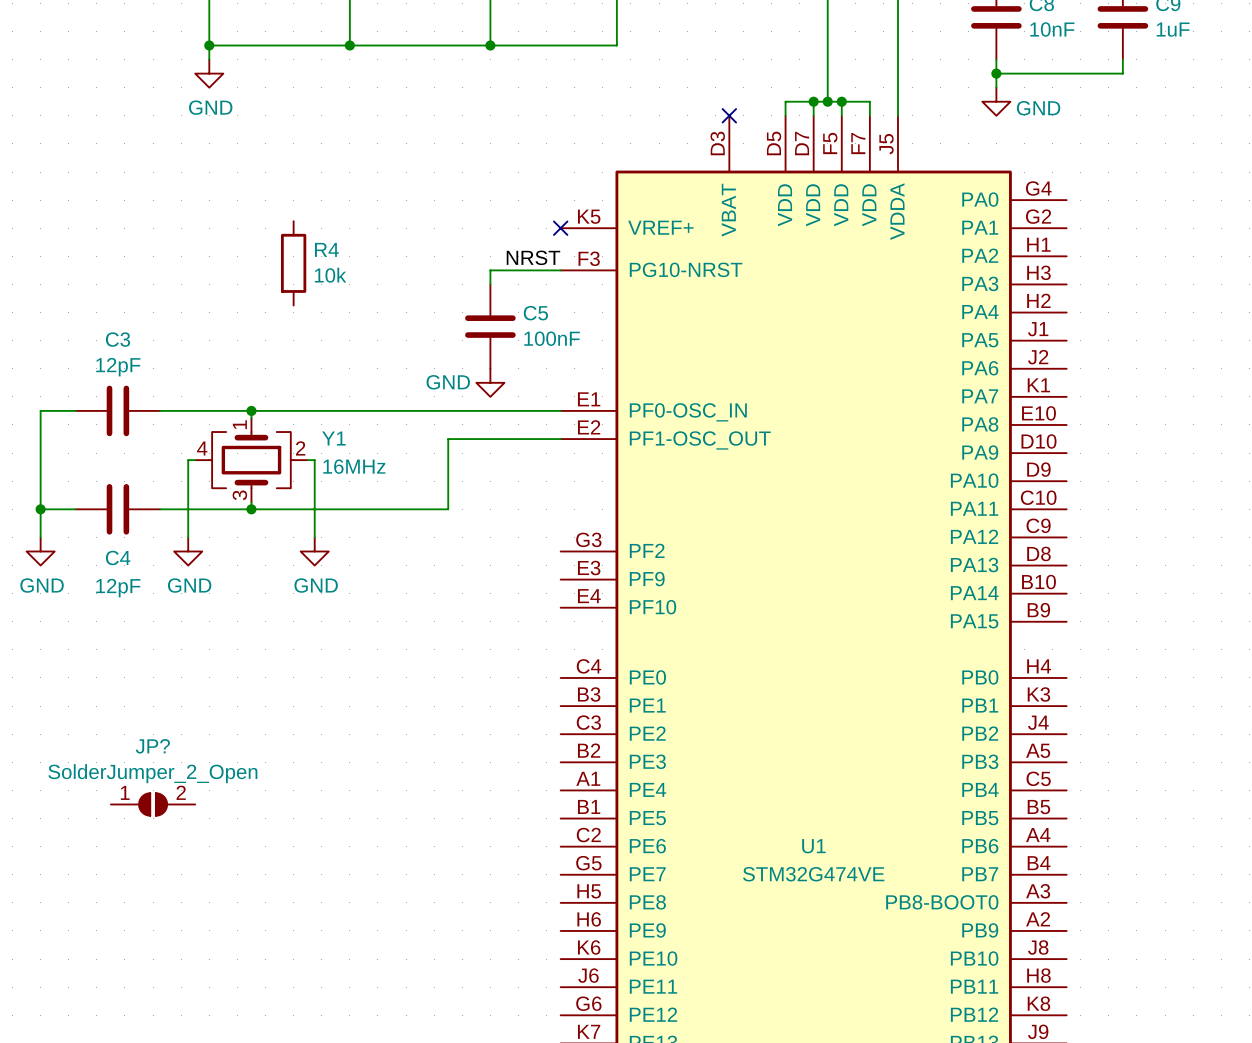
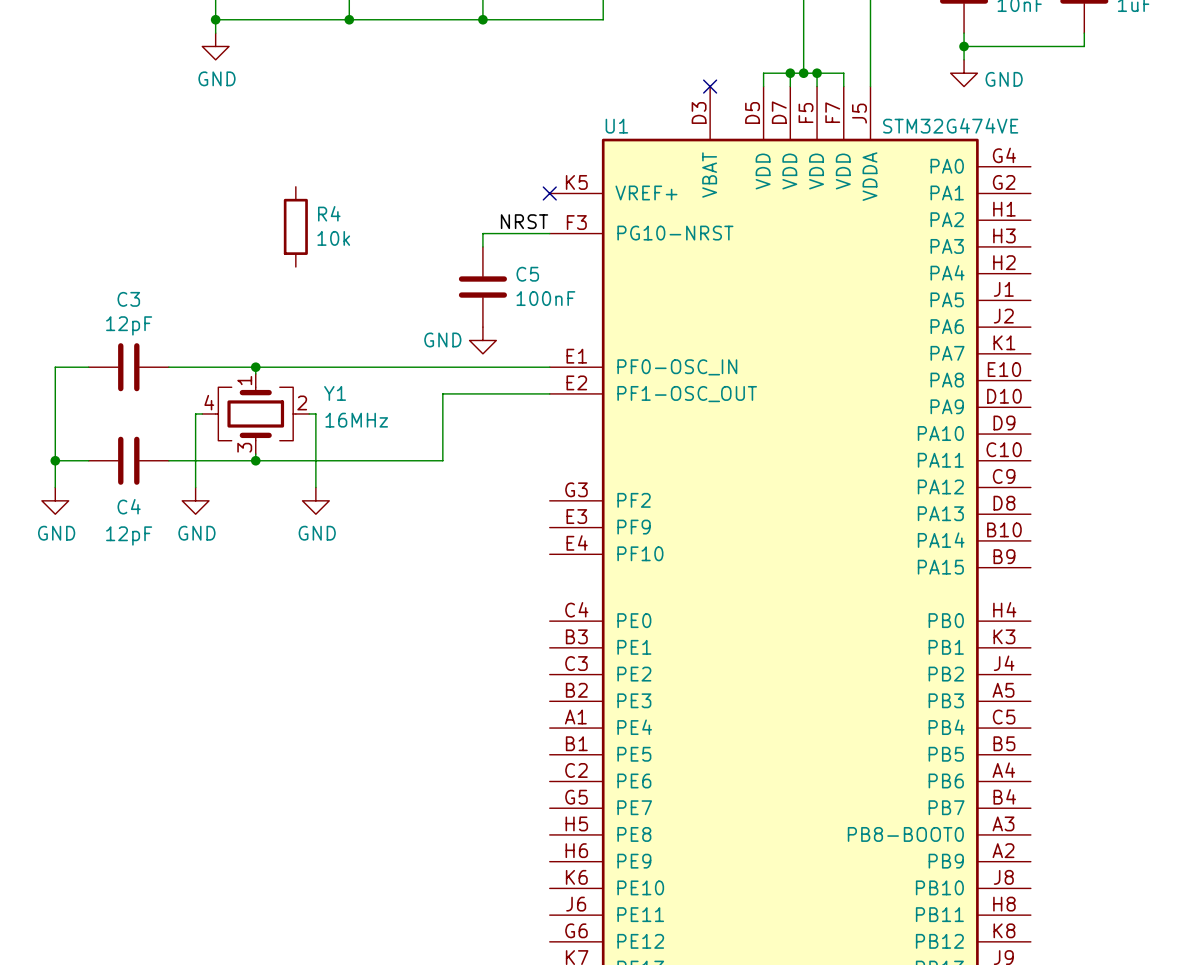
JP?: SolderJumper_2_Open (153, 804) -> none
U1 name position: U1 (813, 846) -> U1 (616, 126)
U1 value position: STM32G474VE (813, 874) -> STM32G474VE (950, 125)

